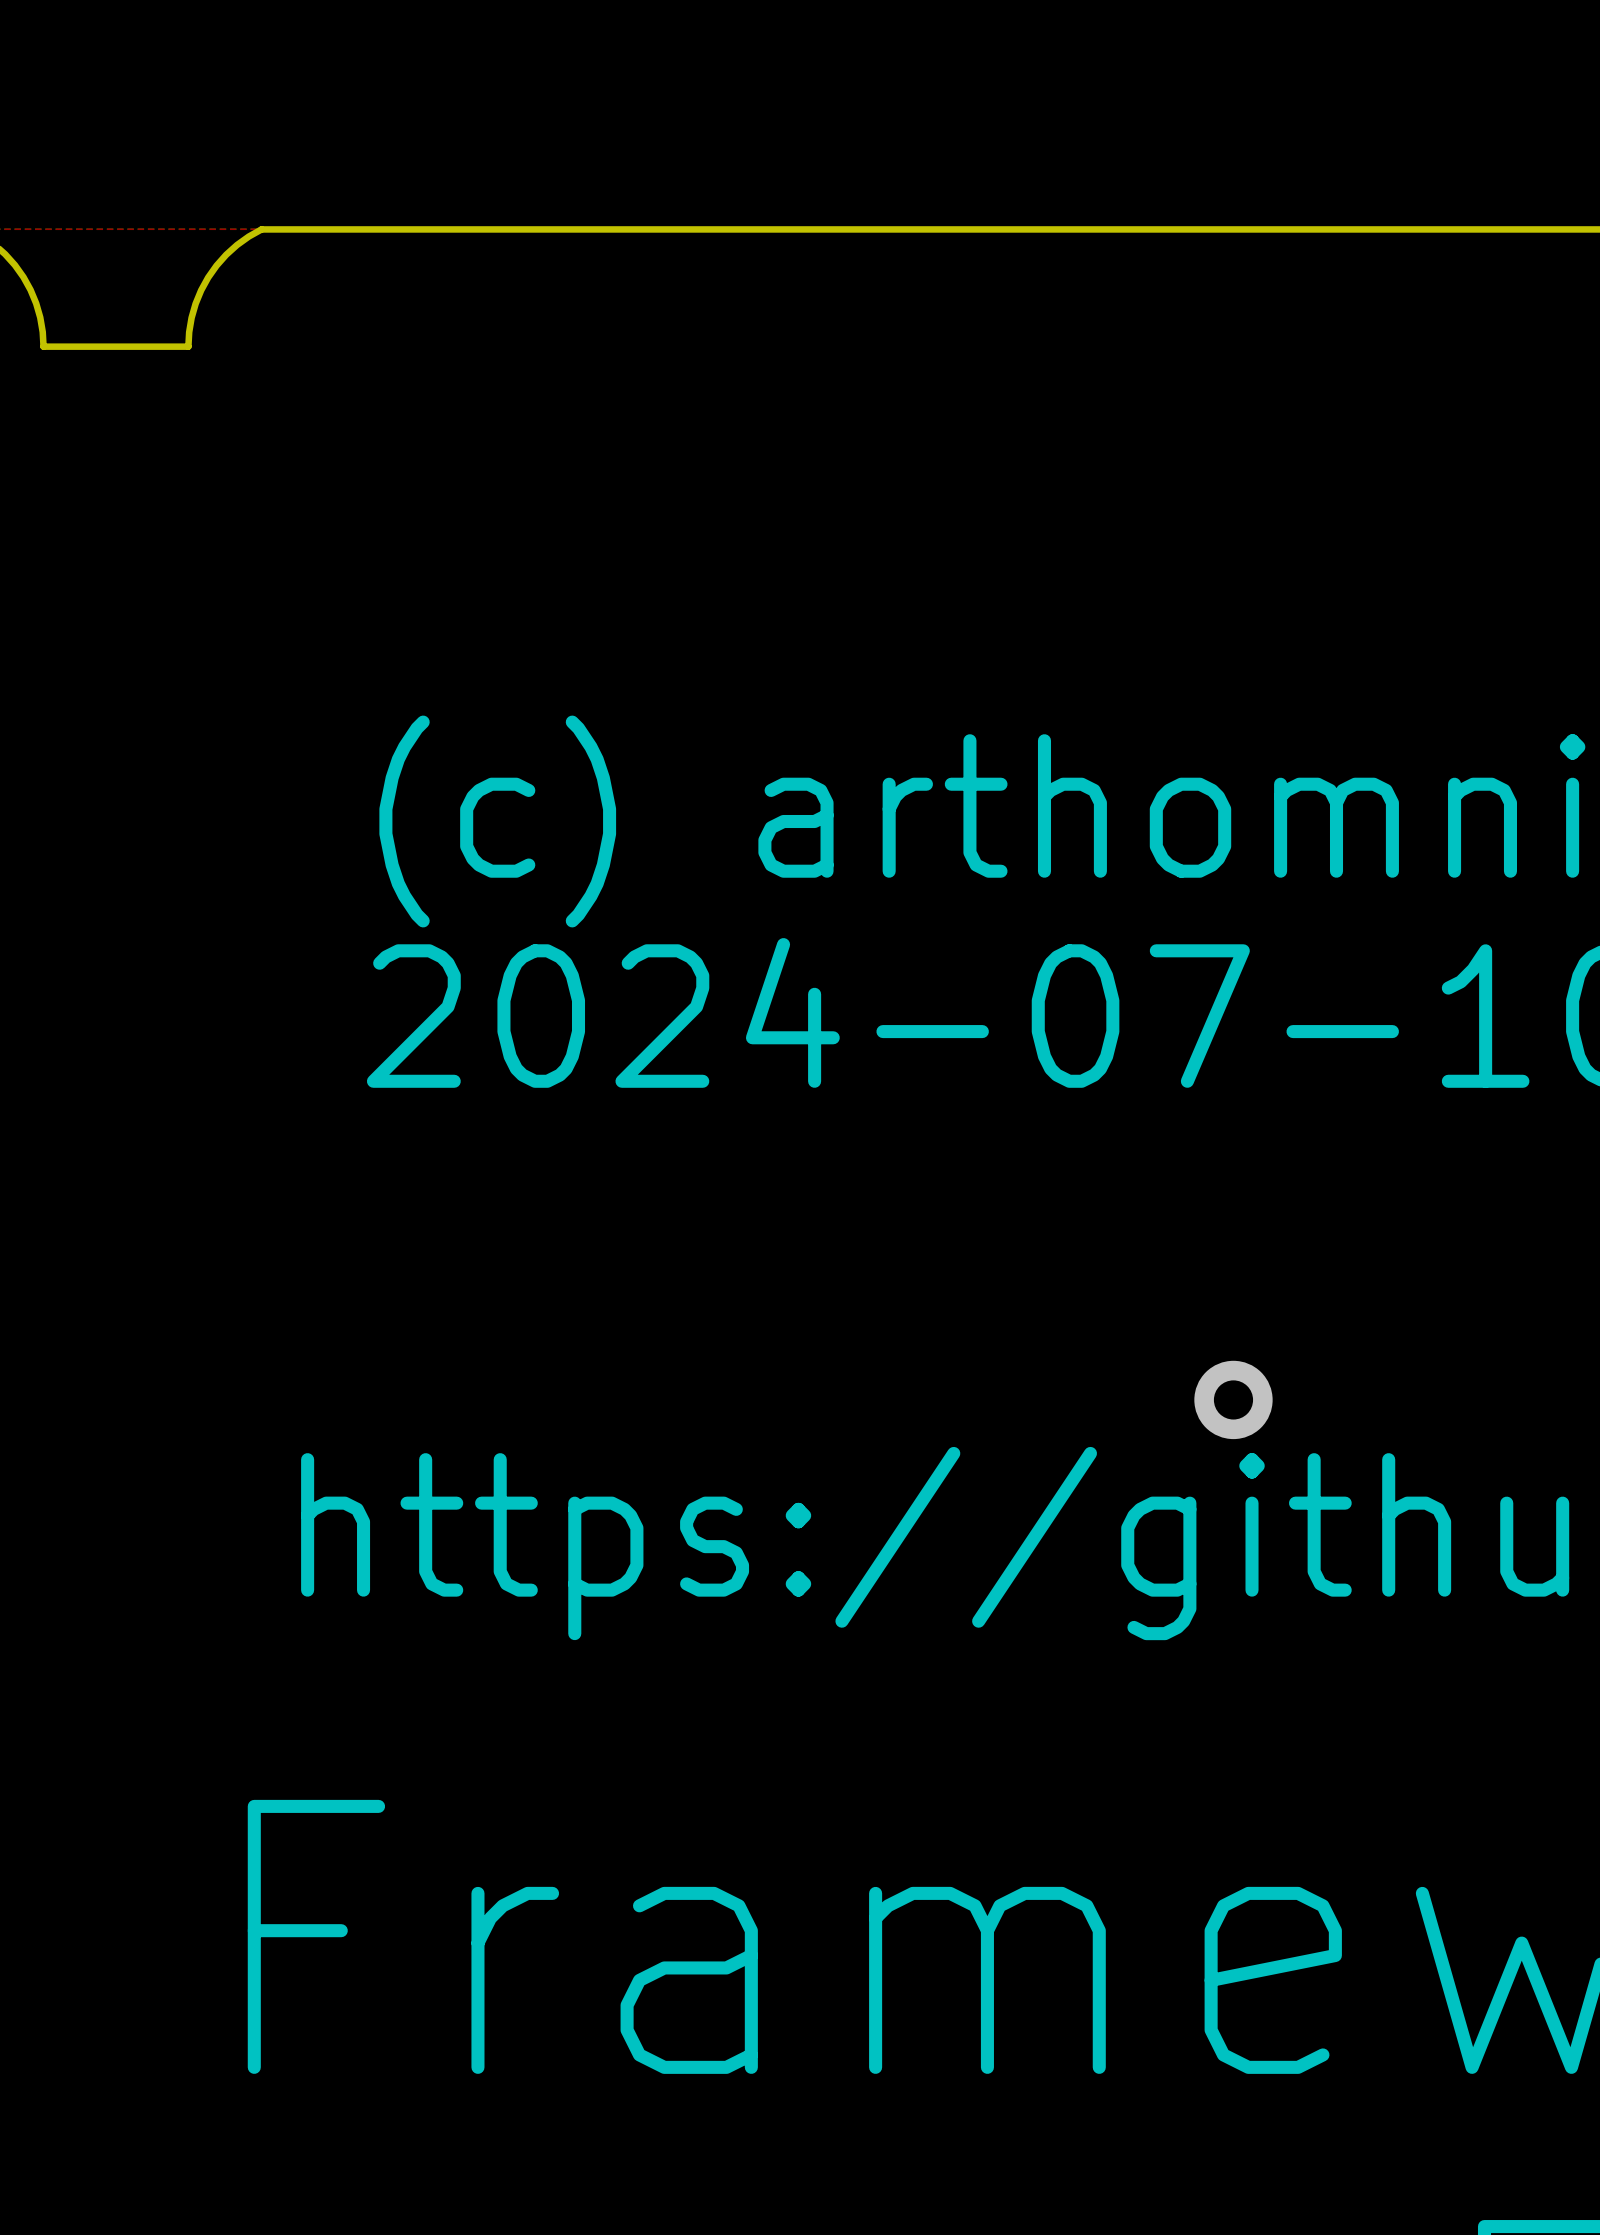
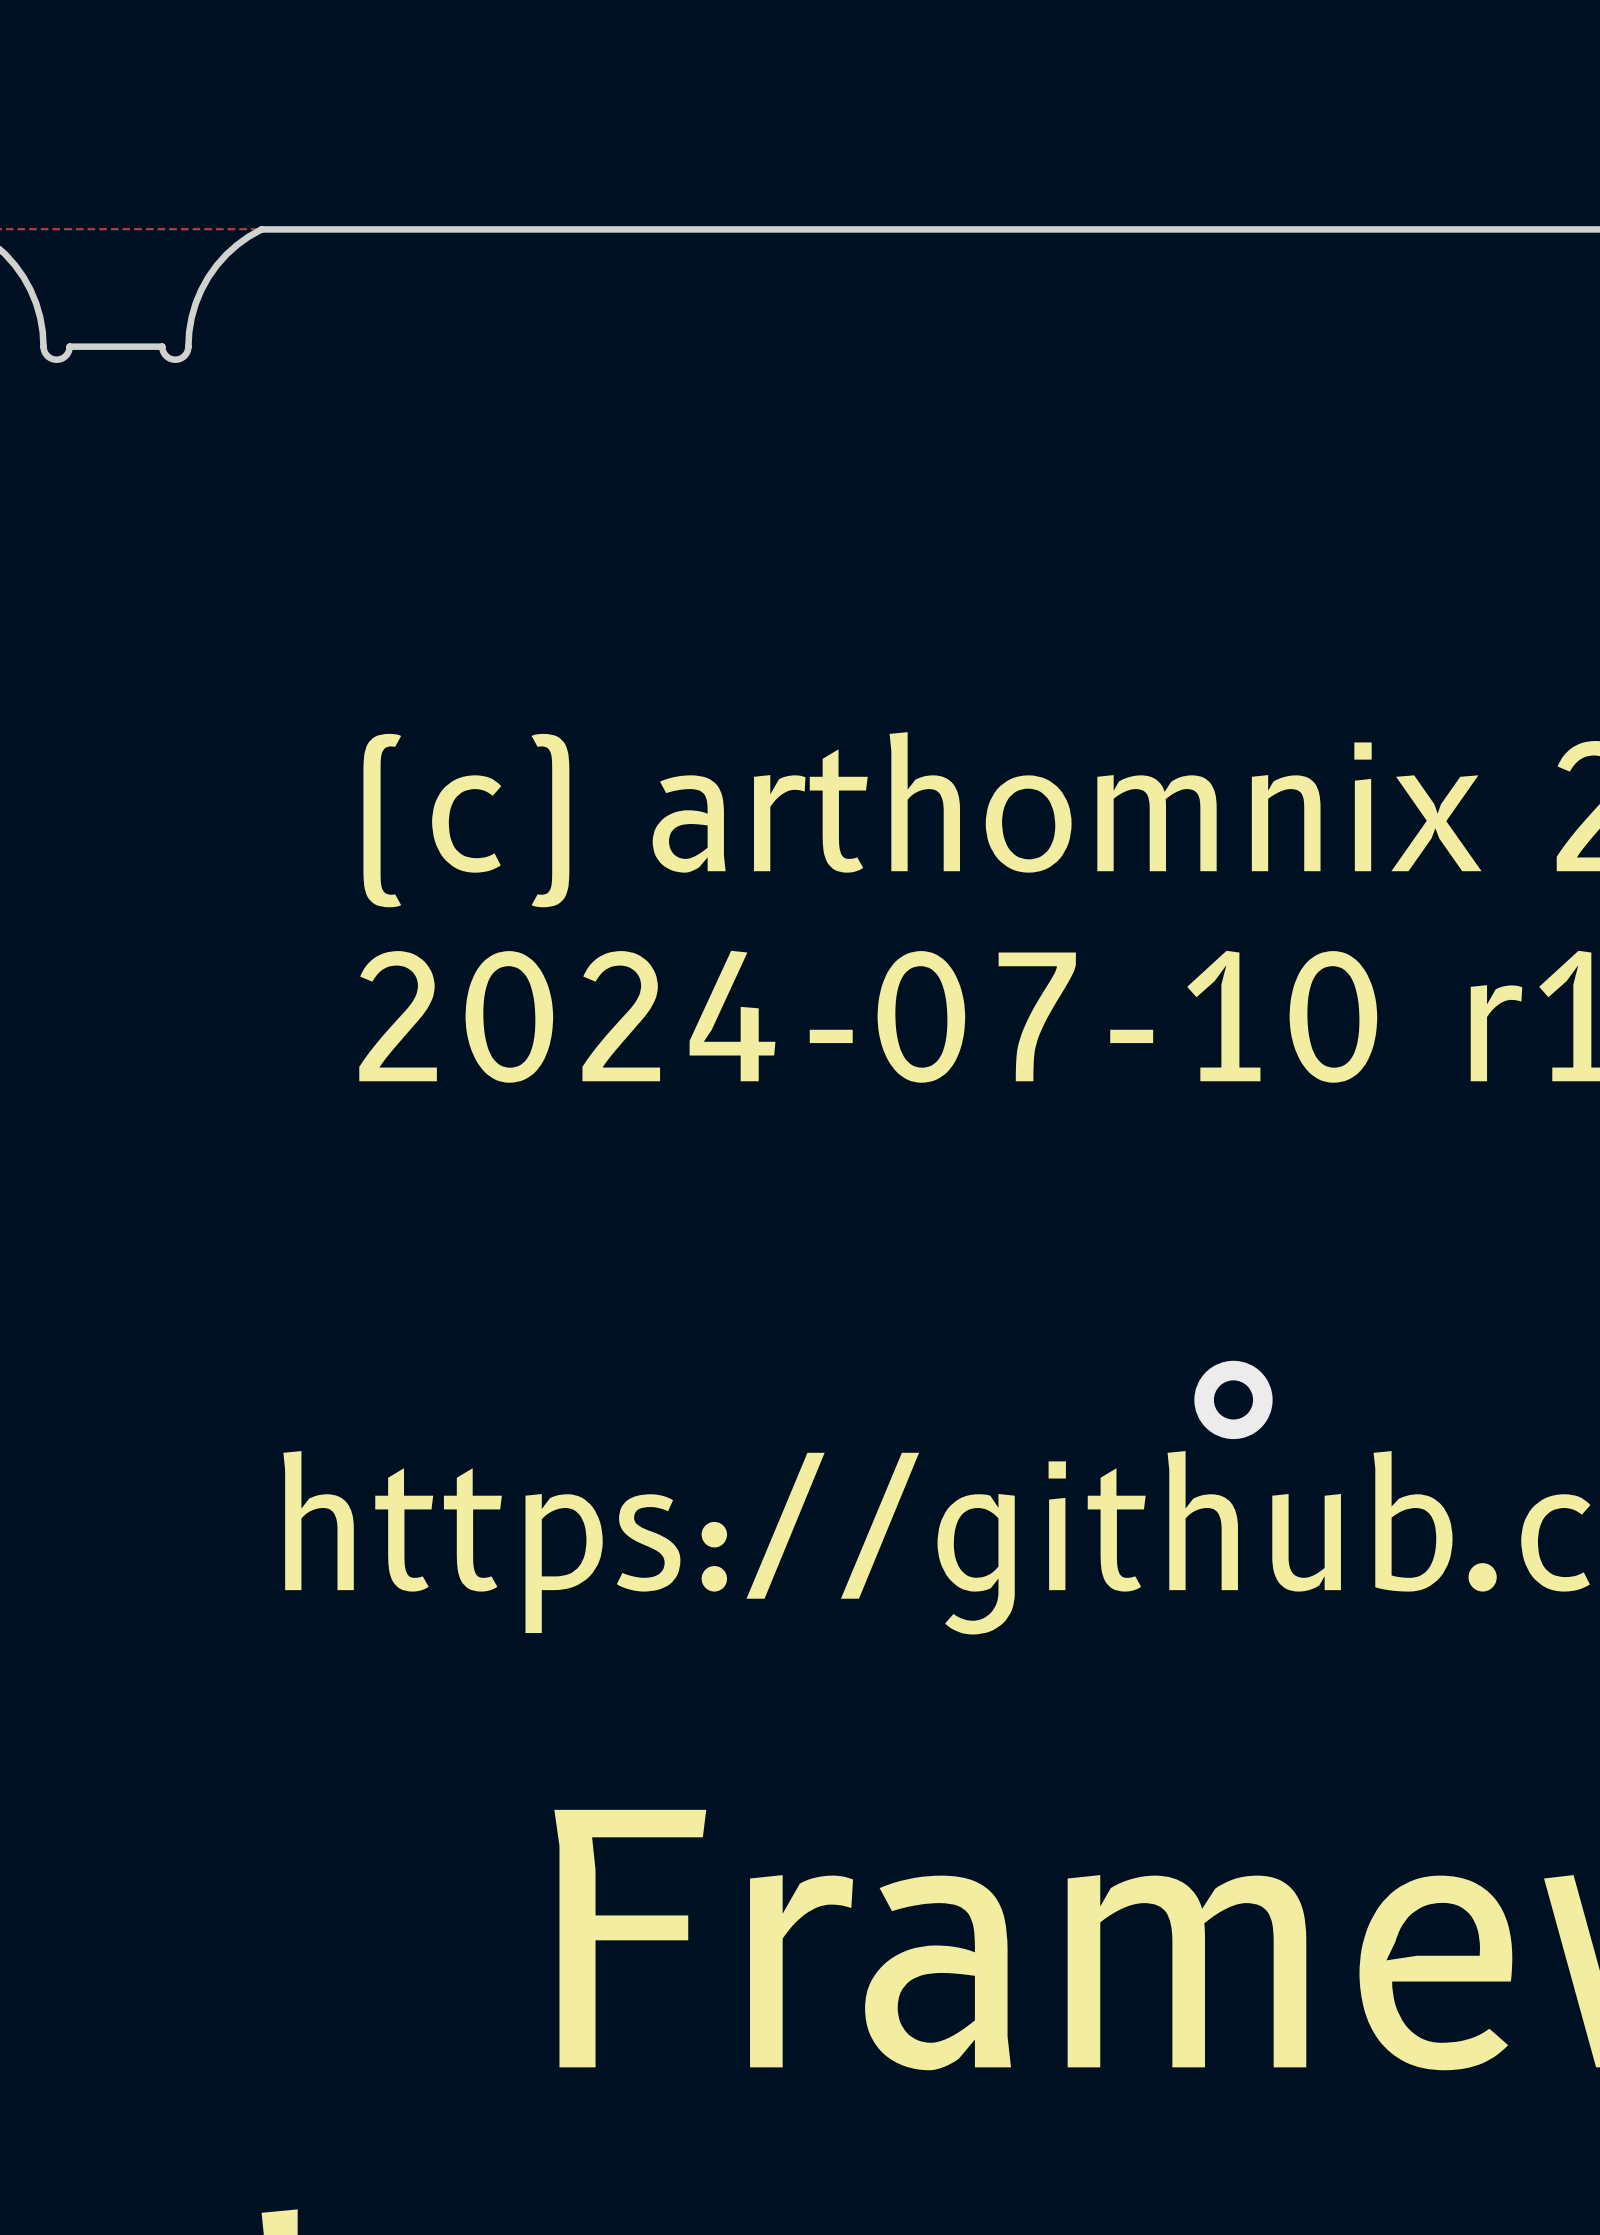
board edge: (43, 346) (69, 346) -> (43, 346) (47, 355) (56, 359) (65, 355) (69, 346)
board edge: (162, 346) (188, 346) -> (162, 346) (166, 355) (175, 359) (184, 355) (188, 346)

